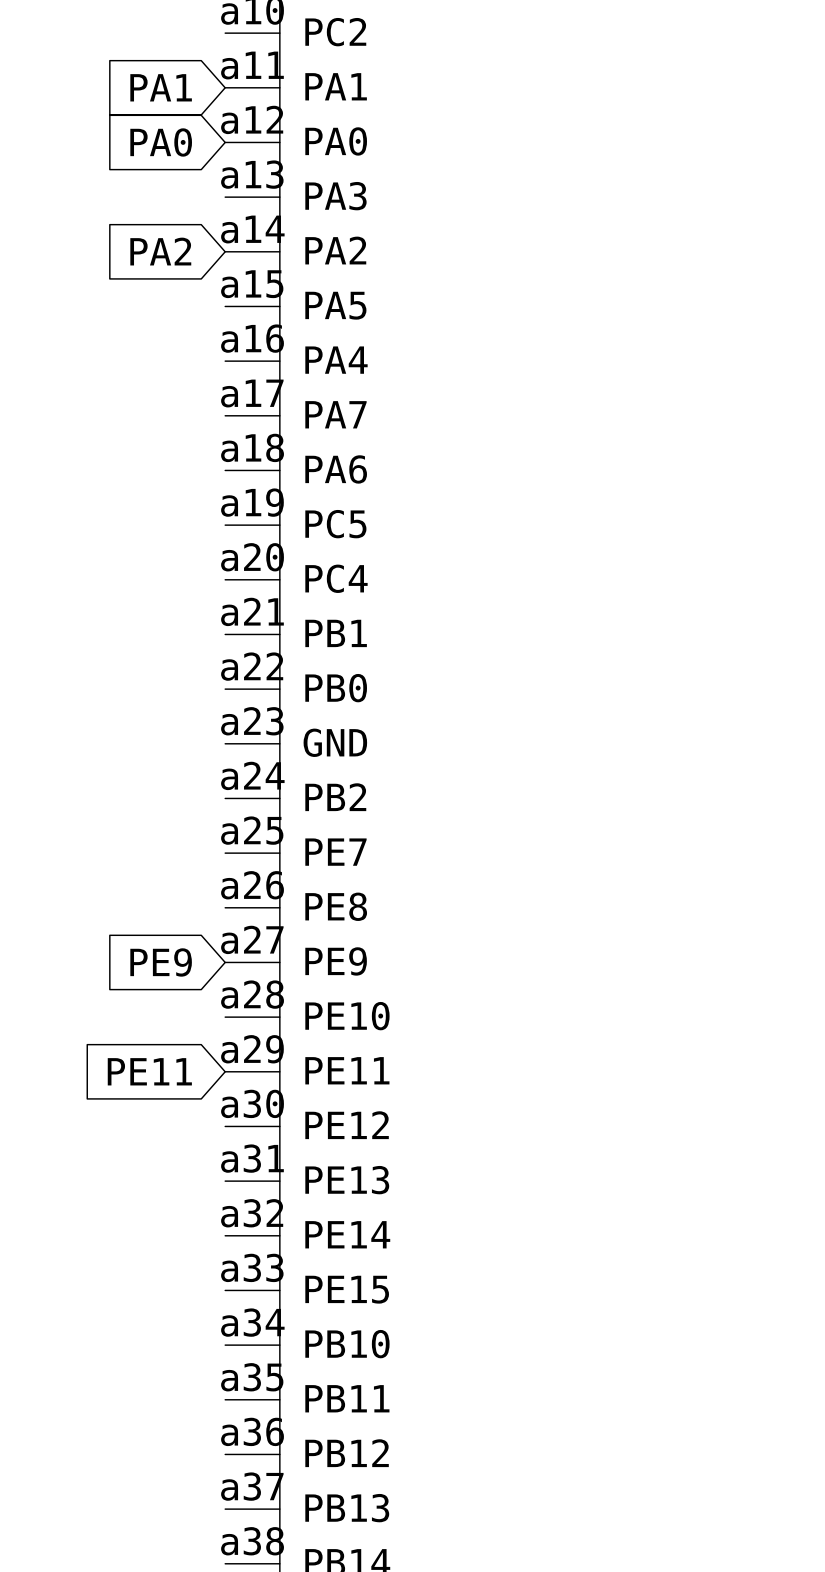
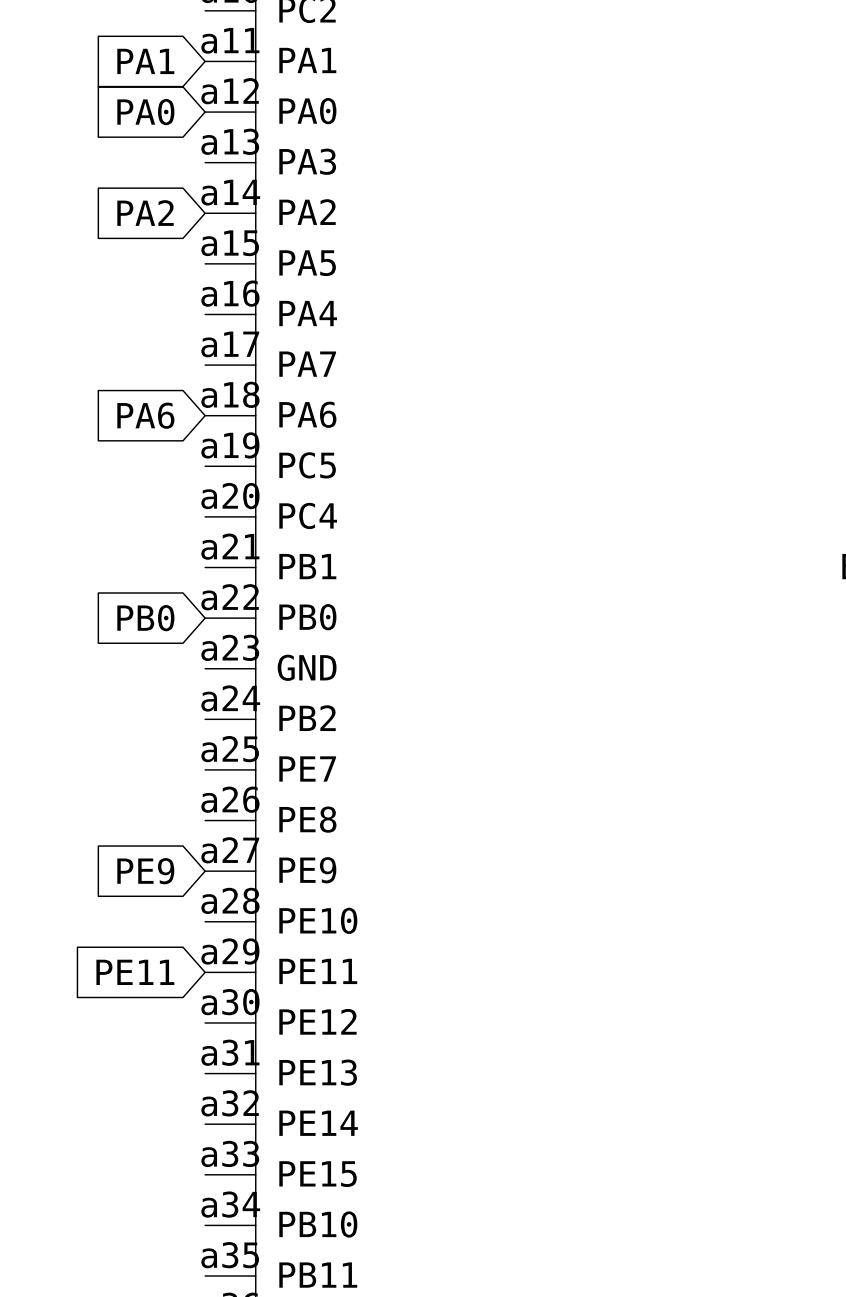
global label: none -> PA6 (145, 415)
global label: none -> PB0 (145, 618)

